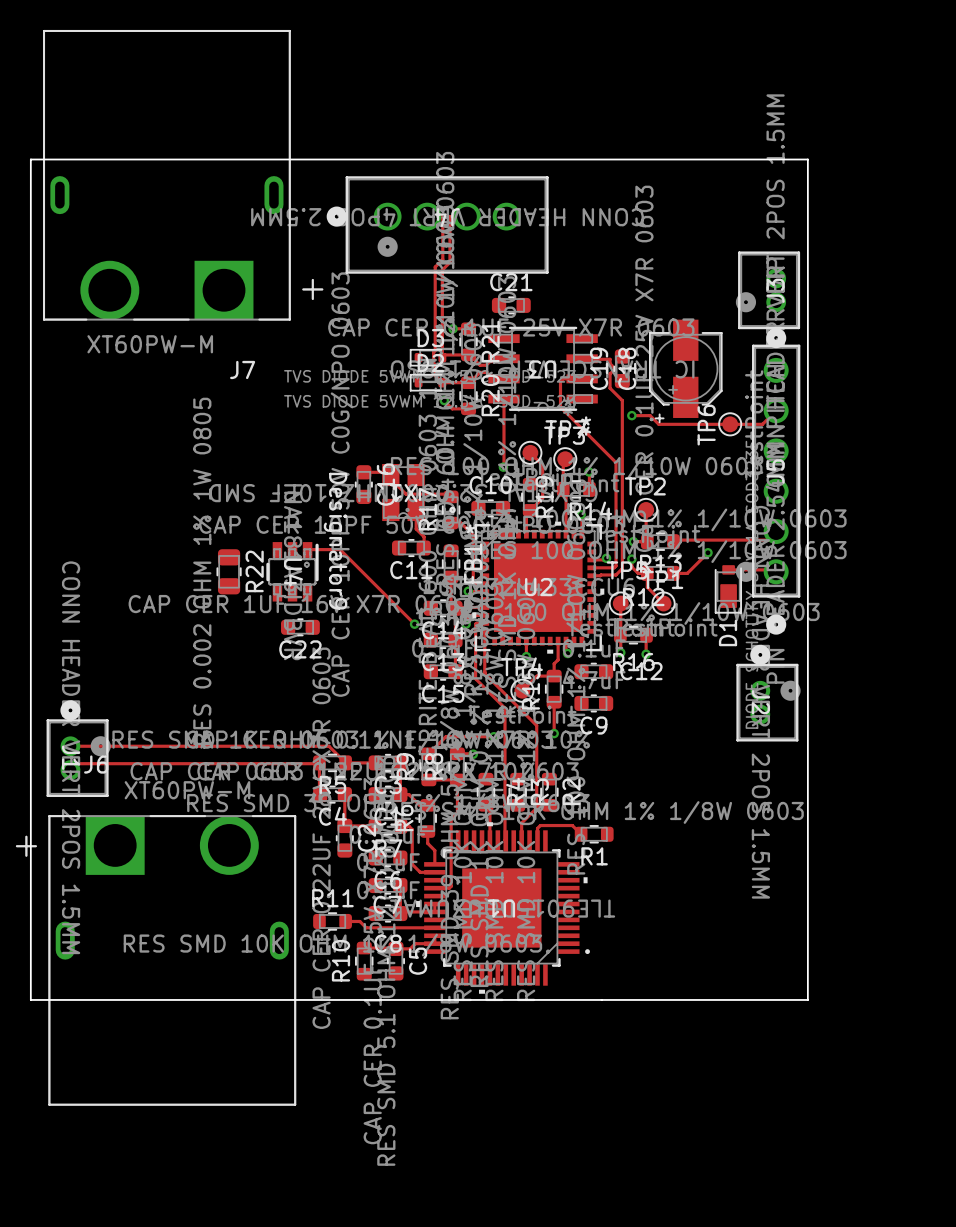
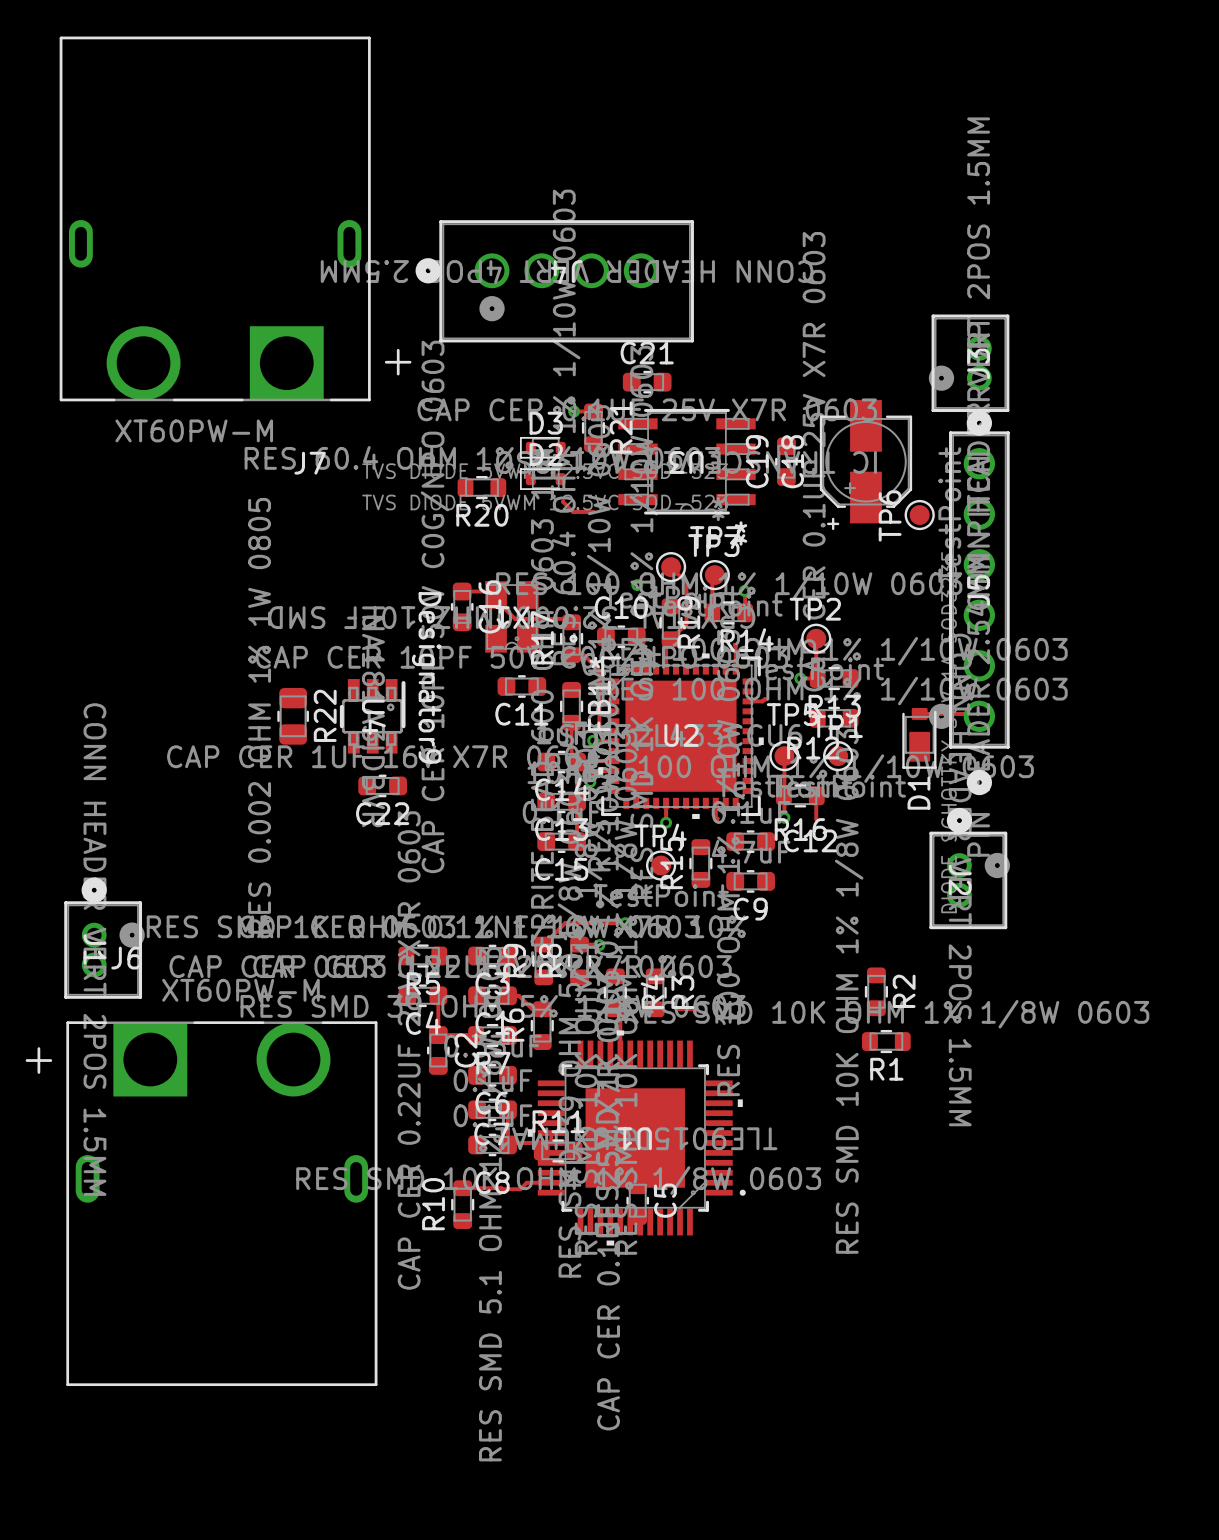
board edge: (30, 159) (30, 999) (807, 999) (807, 159) (30, 159) -> none
track: (427, 216) (442, 218) (442, 259) (435, 267) (435, 350) (433, 352) (435, 375) (442, 382) (469, 382) (480, 372) (486, 372) (492, 378) (503, 378) -> none
track: (466, 216) (449, 216) (449, 262) (442, 270) (442, 357) (445, 354) (469, 354) (480, 365) (486, 365) (492, 358) (502, 357) -> none
track: (582, 358) (610, 359) (610, 363) (614, 368) (610, 374) (610, 388) (622, 400) (622, 568) (616, 574) (591, 575) -> none
track: (582, 378) (563, 378) (560, 381) (560, 407) (616, 462) (616, 566) (614, 567) (591, 567) -> none
R20 rotation: 0° (468, 395) -> 90° clockwise (481, 487)
R20 position: (468, 395) -> (481, 487)
track: (503, 399) (503, 467) -> none
via: (444, 400) -> none
track: (776, 410) (762, 424) (658, 424) (650, 415) (631, 415) -> none
via: (631, 415) -> none
TP6 position: (730, 424) -> (919, 515)
track: (562, 488) (566, 492) (566, 534) -> none
track: (416, 509) (416, 528) (424, 536) (423, 548) -> none
via: (581, 514) -> none
track: (668, 540) (773, 540) -> none
track: (307, 550) (340, 549) (414, 624) -> none
track: (707, 552) (687, 573) (673, 573) -> none
via: (707, 552) -> none
via: (606, 558) -> none
track: (631, 559) (631, 567) (638, 573) (647, 573) (647, 587) (663, 603) -> none
via: (631, 559) -> none
track: (484, 623) (475, 624) (475, 678) (505, 708) (505, 841) -> none
via: (414, 624) -> none
track: (484, 631) (484, 673) (536, 725) (536, 808) (521, 823) (521, 841) -> none
track: (558, 641) (558, 659) (554, 663) (554, 676) (537, 676) (522, 690) -> none
via: (567, 653) -> none
via: (646, 654) -> none
track: (554, 702) (554, 733) -> none
via: (554, 733) -> none
track: (70, 746) (328, 746) (345, 762) (375, 762) -> none
track: (70, 770) (76, 763) (319, 762) (320, 794) -> none
track: (428, 779) (457, 779) (457, 812) (451, 819) (451, 886) (449, 888) (434, 888) -> none
R2 position: (549, 792) -> (876, 991)
track: (401, 826) (409, 826) (412, 829) (412, 864) (420, 872) (434, 872) -> none
track: (427, 831) (427, 843) (434, 850) (434, 864) -> none
track: (581, 834) (572, 825) (540, 825) (537, 828) (537, 841) -> none
R1 position: (594, 834) -> (886, 1041)
R11 position: (332, 921) -> (558, 1150)
track: (345, 921) (359, 921) (366, 927) (434, 927) -> none
C5 position: (395, 961) -> (637, 1200)

